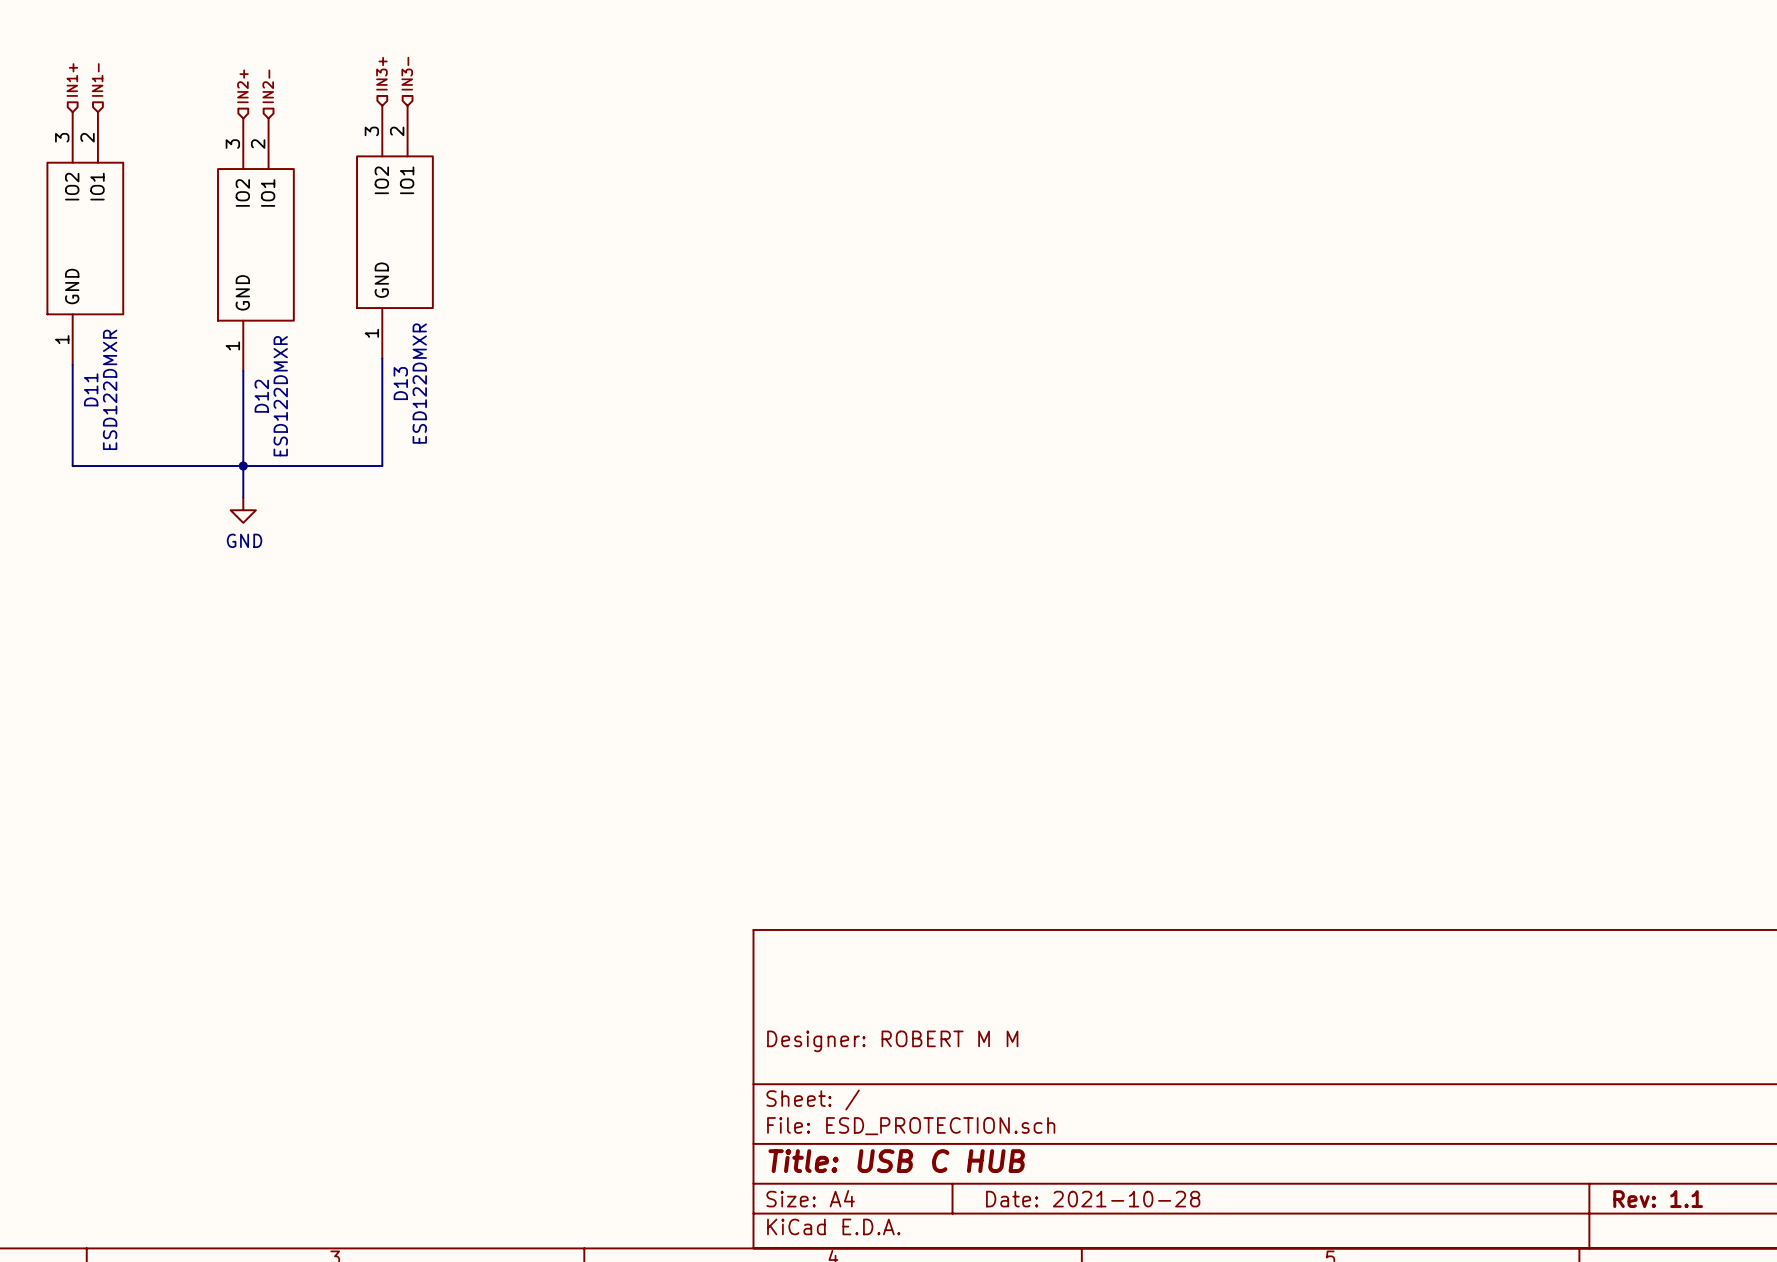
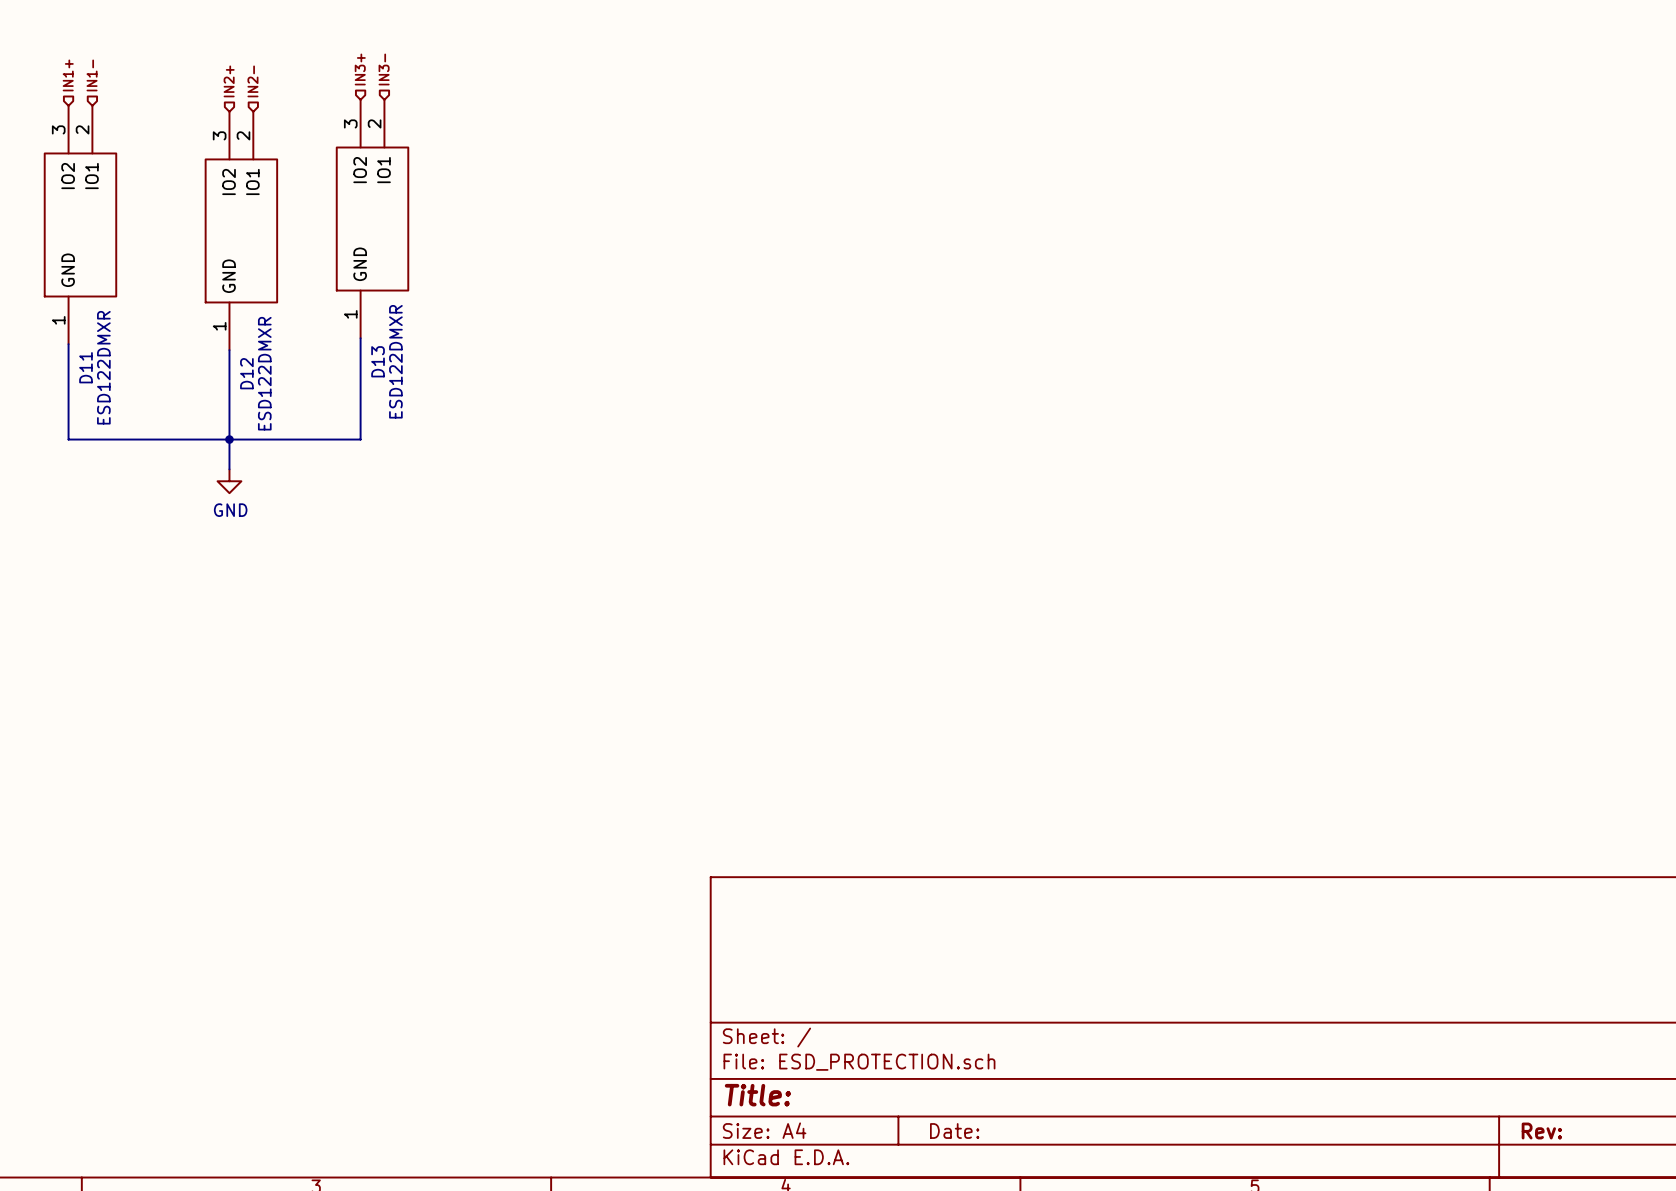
title block: Designer: ROBERT M M (892, 1041) -> none
title block: Title: USB C HUB (896, 1161) -> Title: (757, 1095)
title block: Date: 2021-10-28 (1093, 1199) -> Date: (954, 1131)
title block: Rev: 1.1 (1658, 1199) -> Rev: (1541, 1131)

